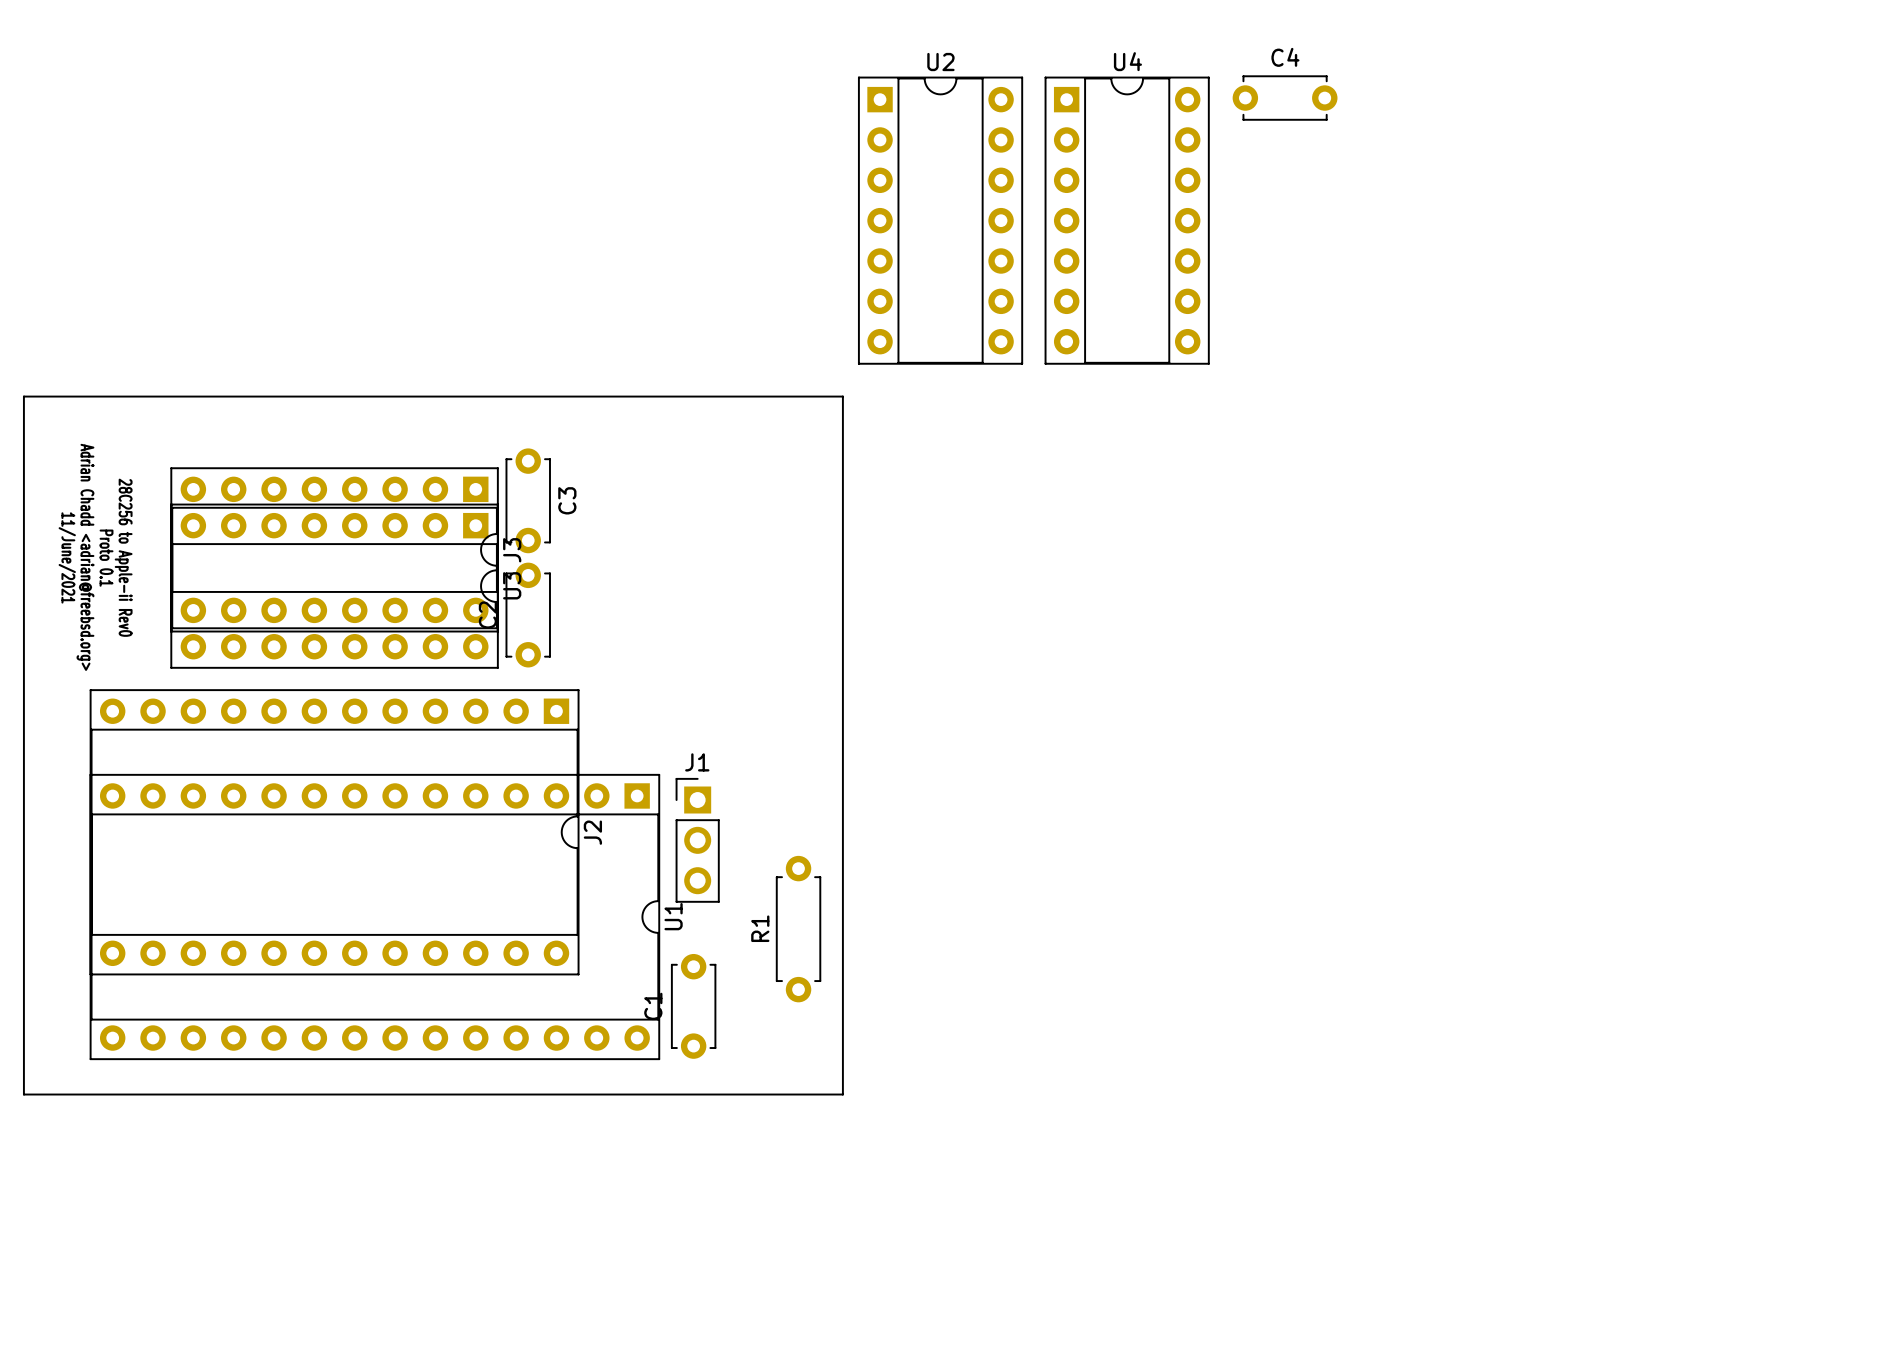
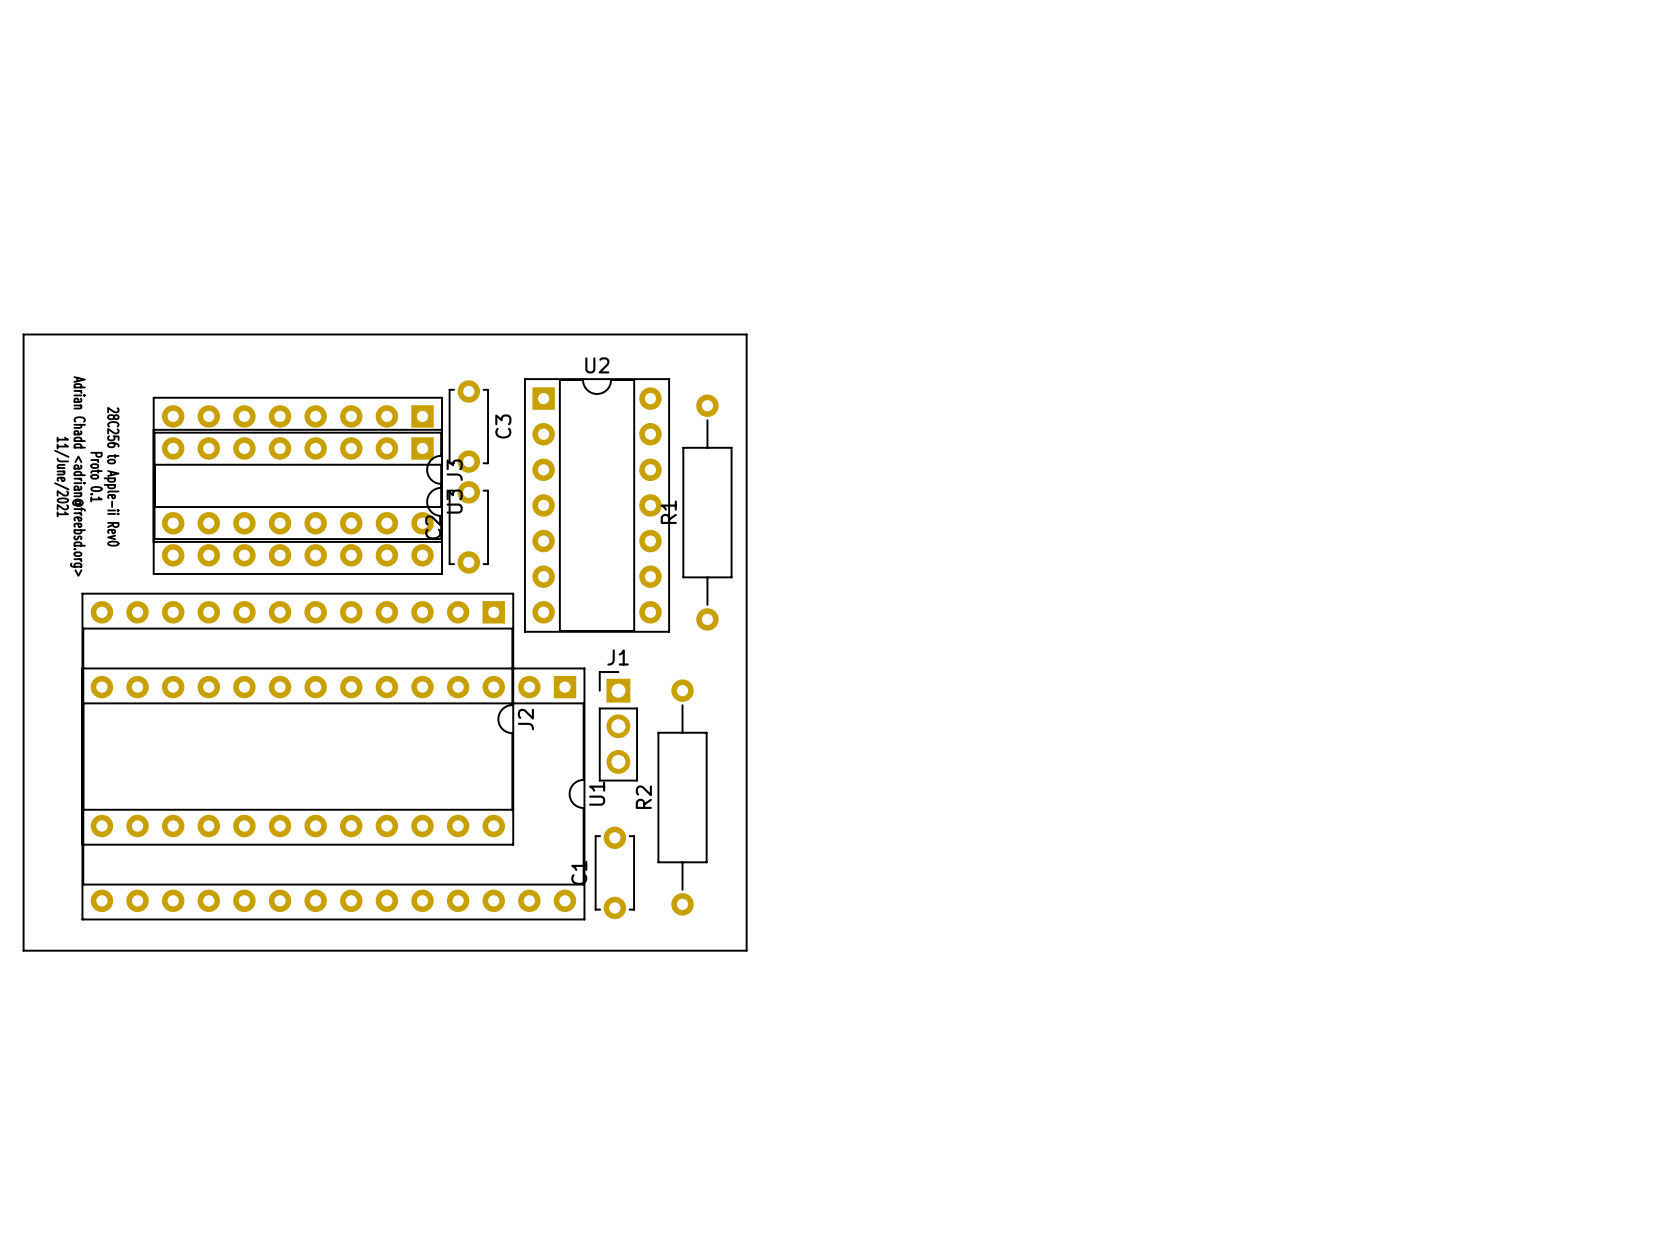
C4: (1285, 98) -> none
U2 position: (940, 220) -> (597, 505)
U4: (1127, 220) -> none
R1 footprint: [775, 855, 822, 1003] -> [682, 394, 733, 631]
R2: none -> (682, 797)

